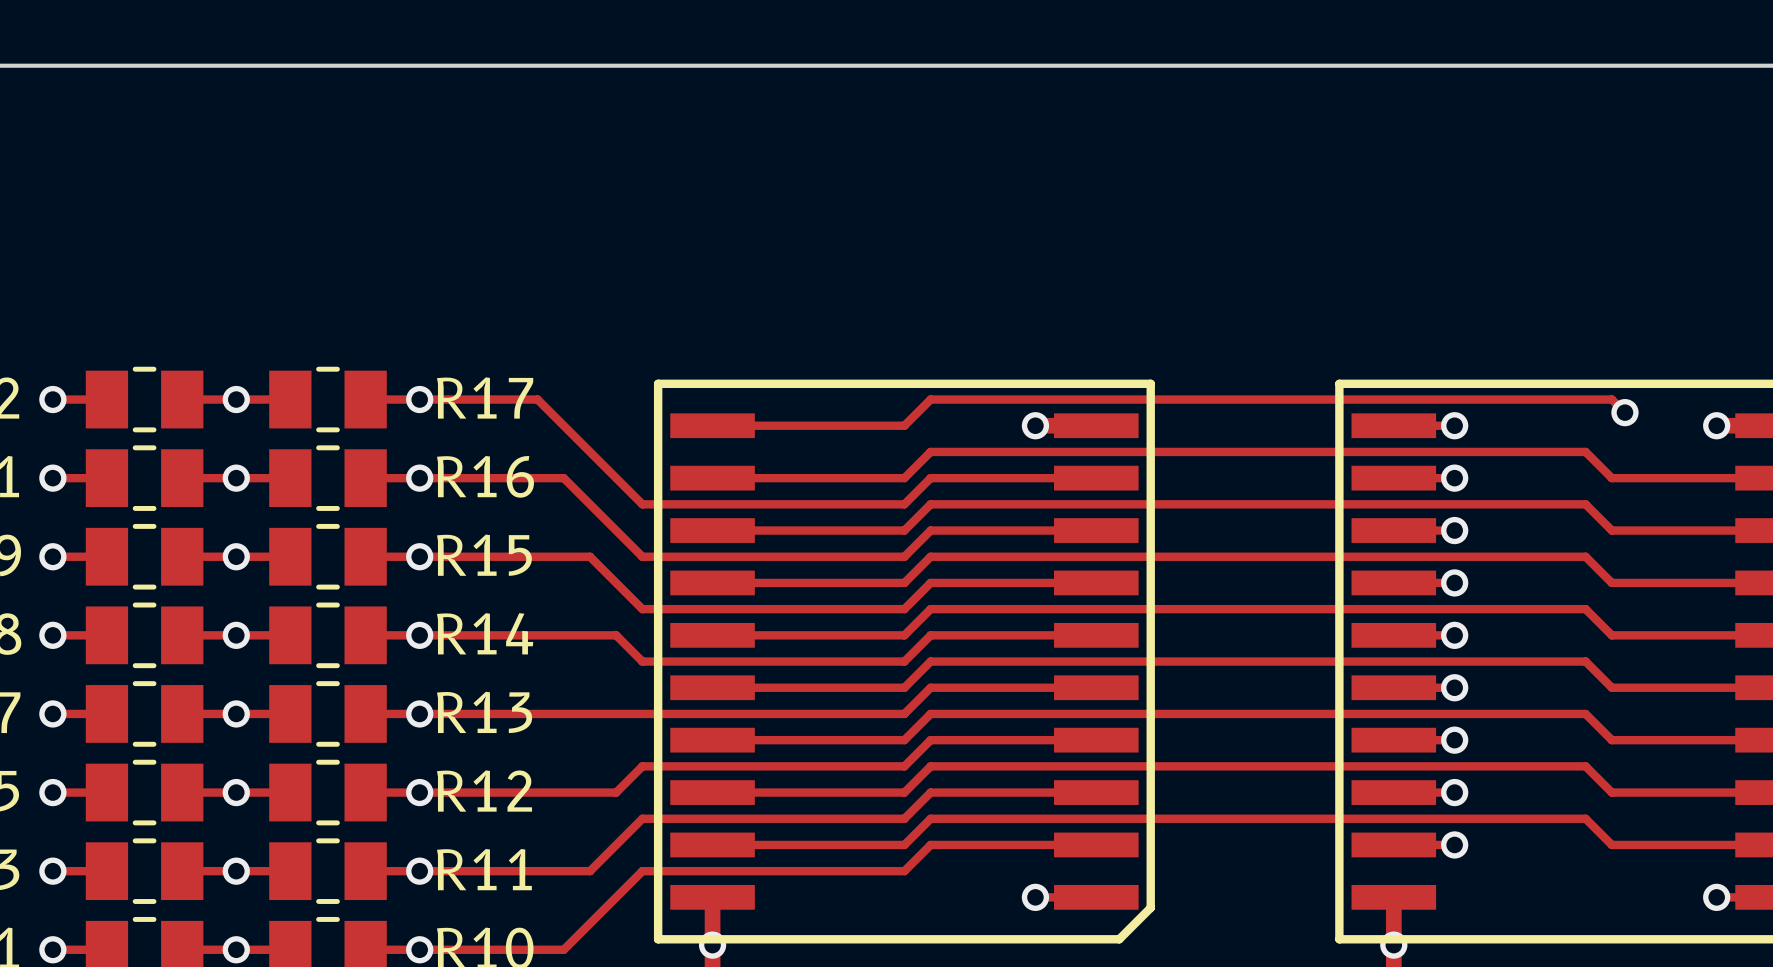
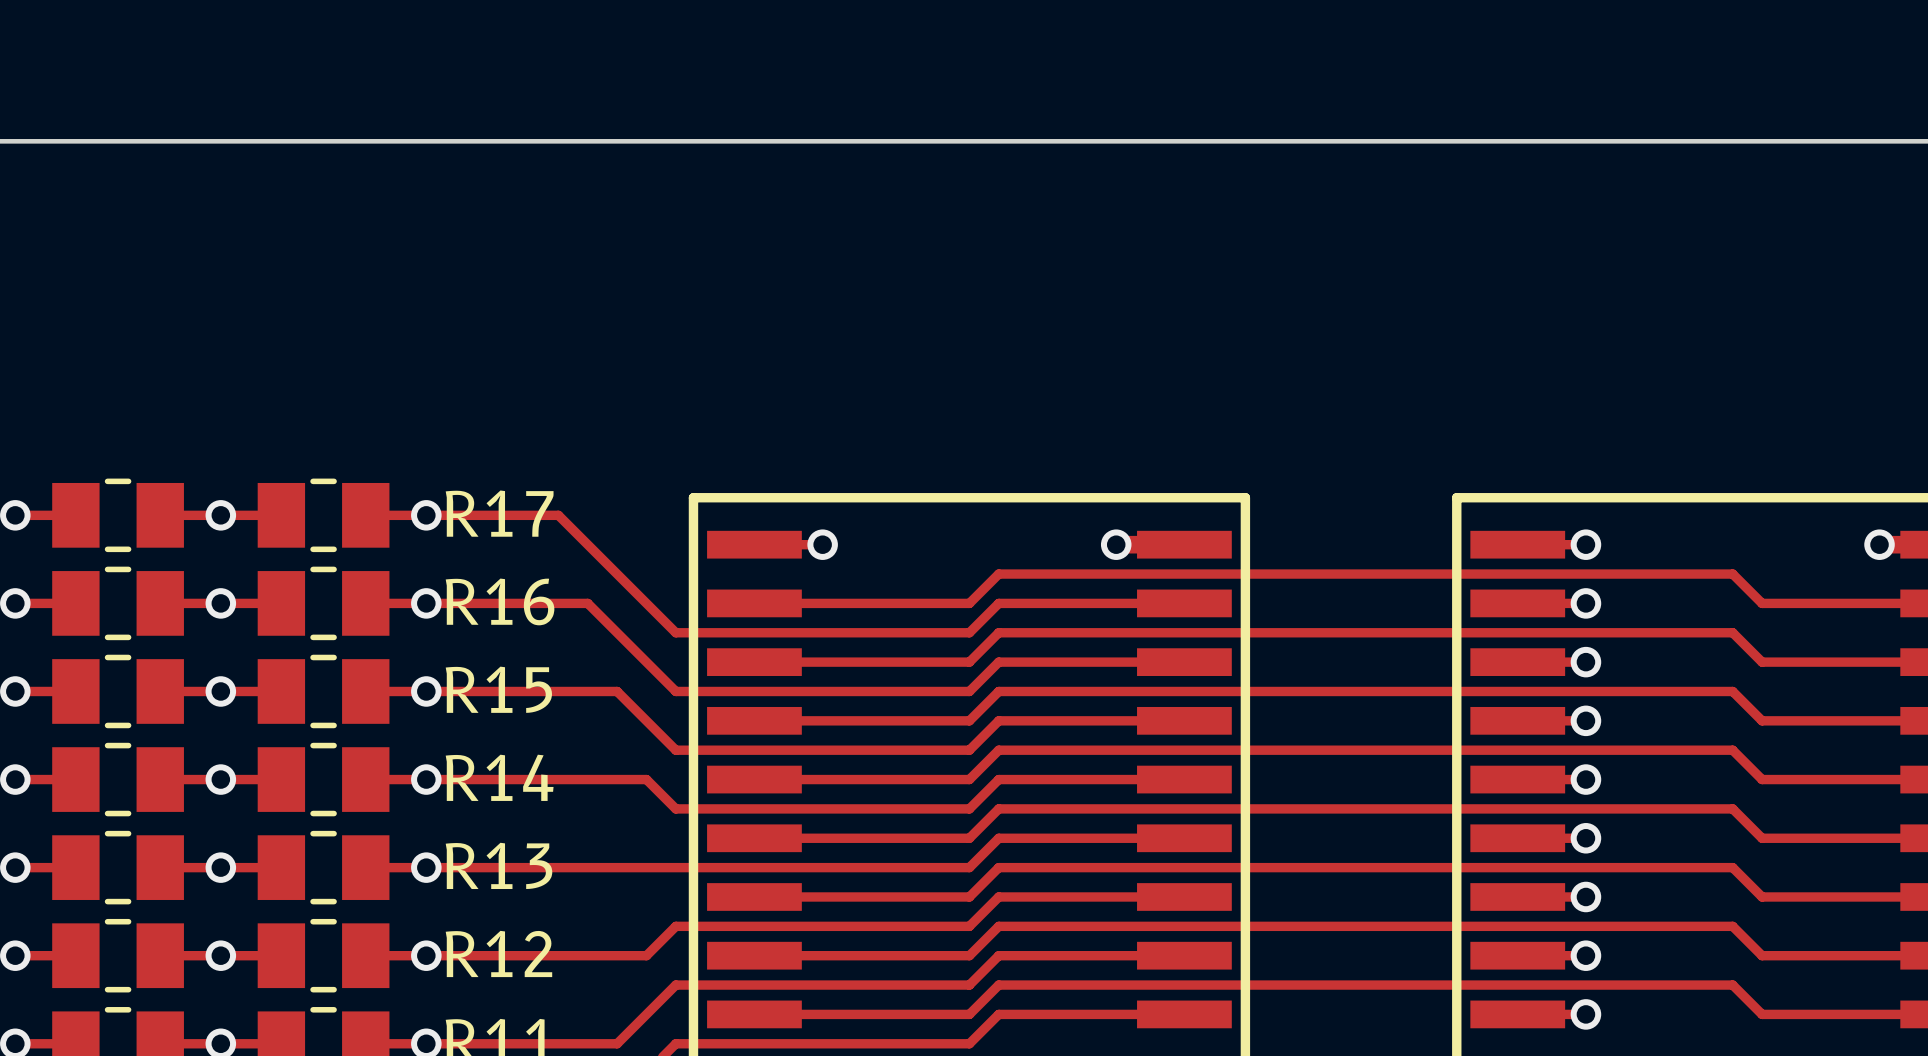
track: (1624, 412) (1611, 399) (930, 399) (904, 425) (773, 425) -> none
via: (1624, 412) -> none
via: none -> (822, 544)

